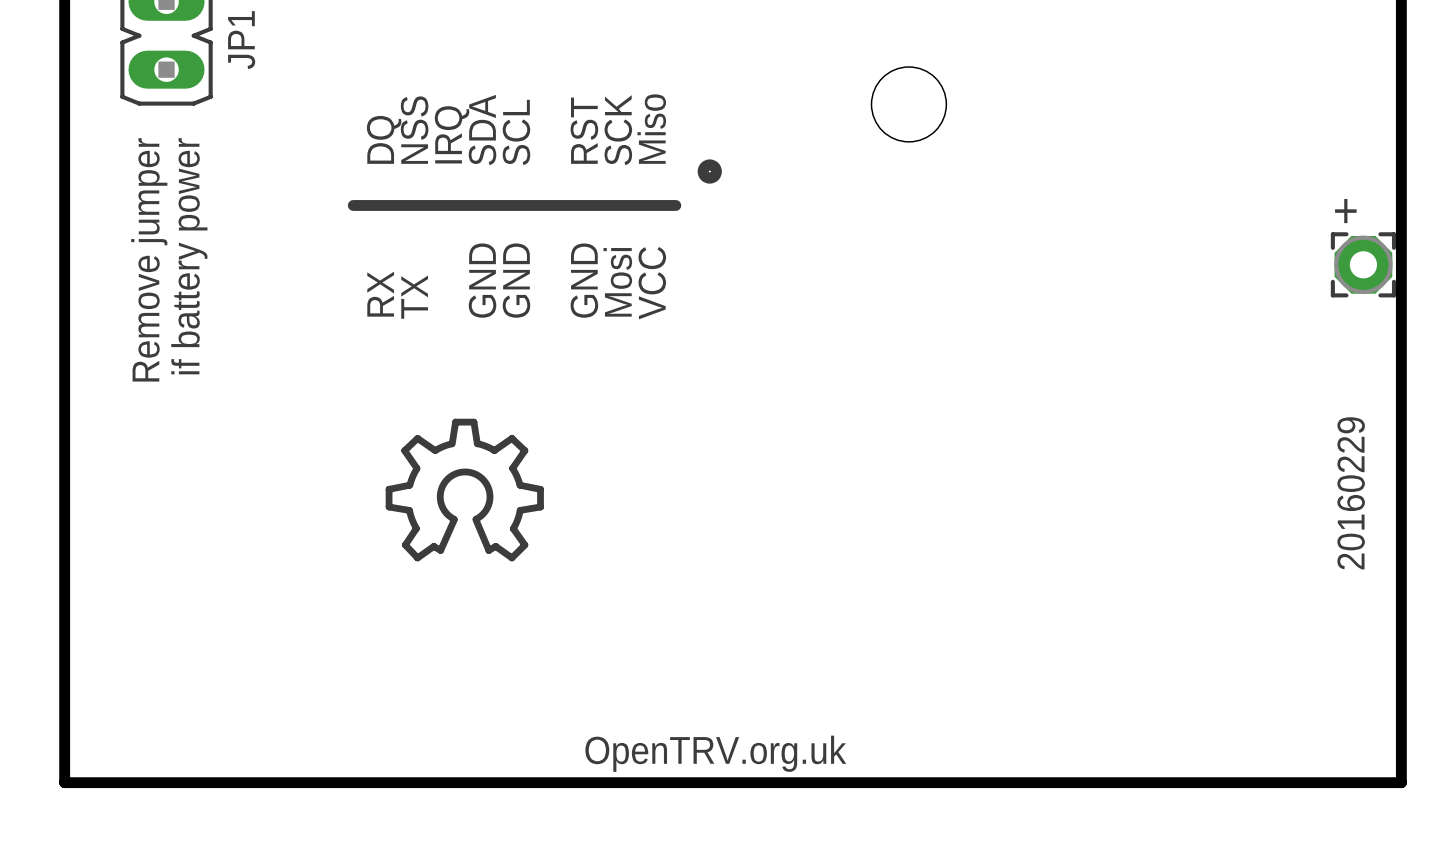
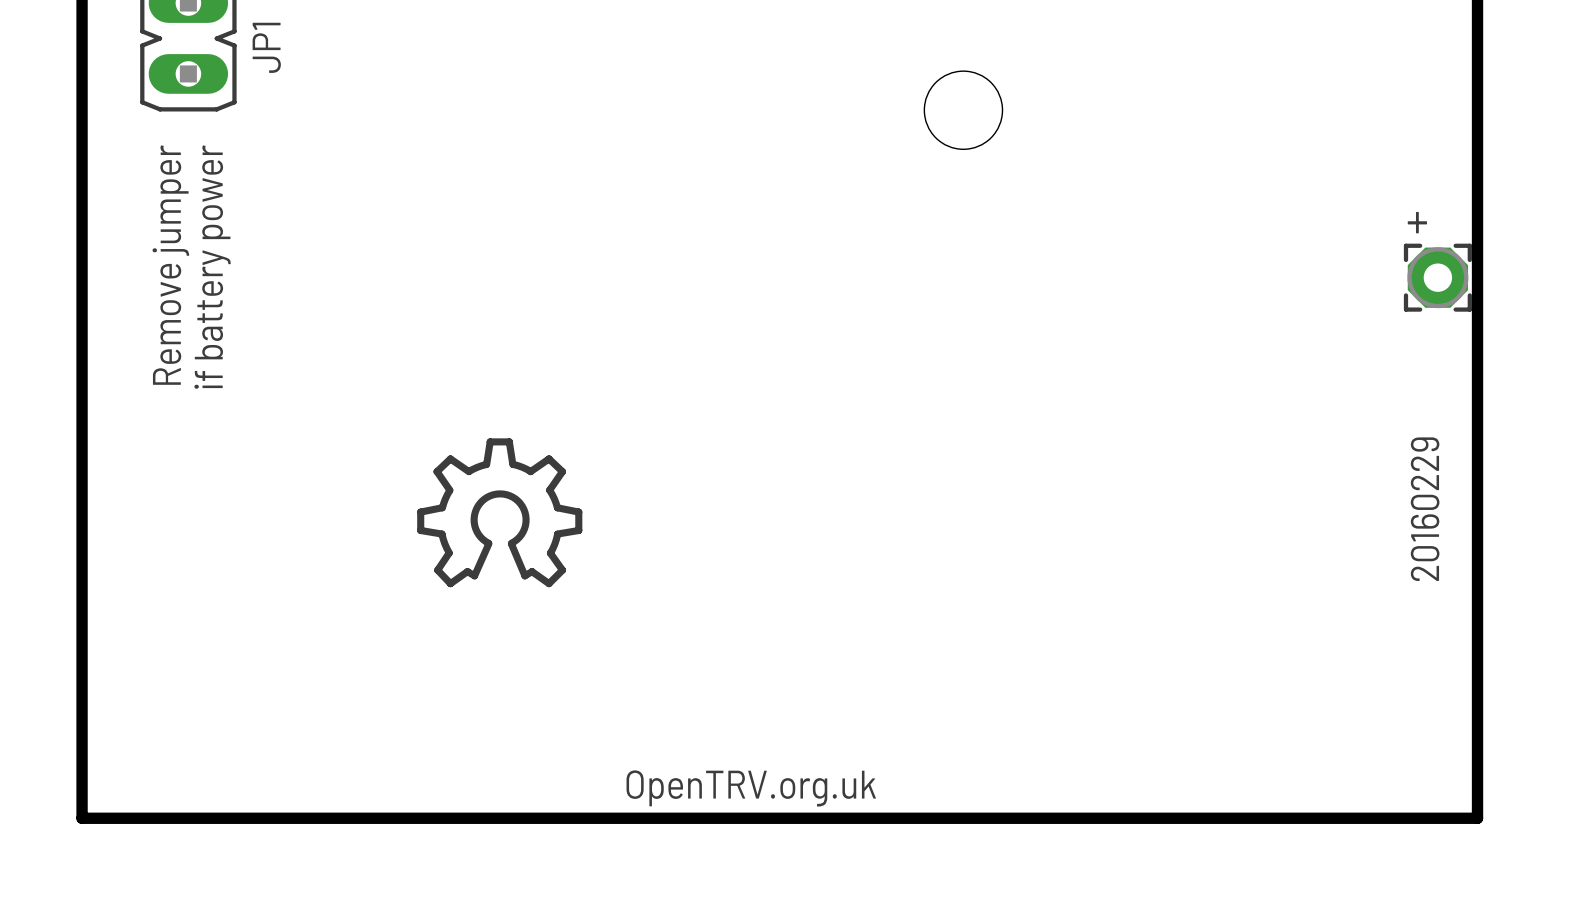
text: SDA (482, 129) -> none
text: Miso (651, 129) -> none
text: NSS (414, 130) -> none
text: RST (584, 130) -> none
text: SCK (618, 130) -> none
text: SCL (516, 132) -> none
text: IRQ (452, 134) -> none
text: DQ (384, 139) -> none
drawing: [697, 159, 722, 184] -> none
line: (353, 205) (675, 205) -> none
text: GND (482, 280) -> none
text: GND (516, 280) -> none
text: GND (584, 280) -> none
text: Mosi (617, 282) -> none
text: VCC (652, 283) -> none
text: RX (380, 294) -> none
text: TX (414, 297) -> none

